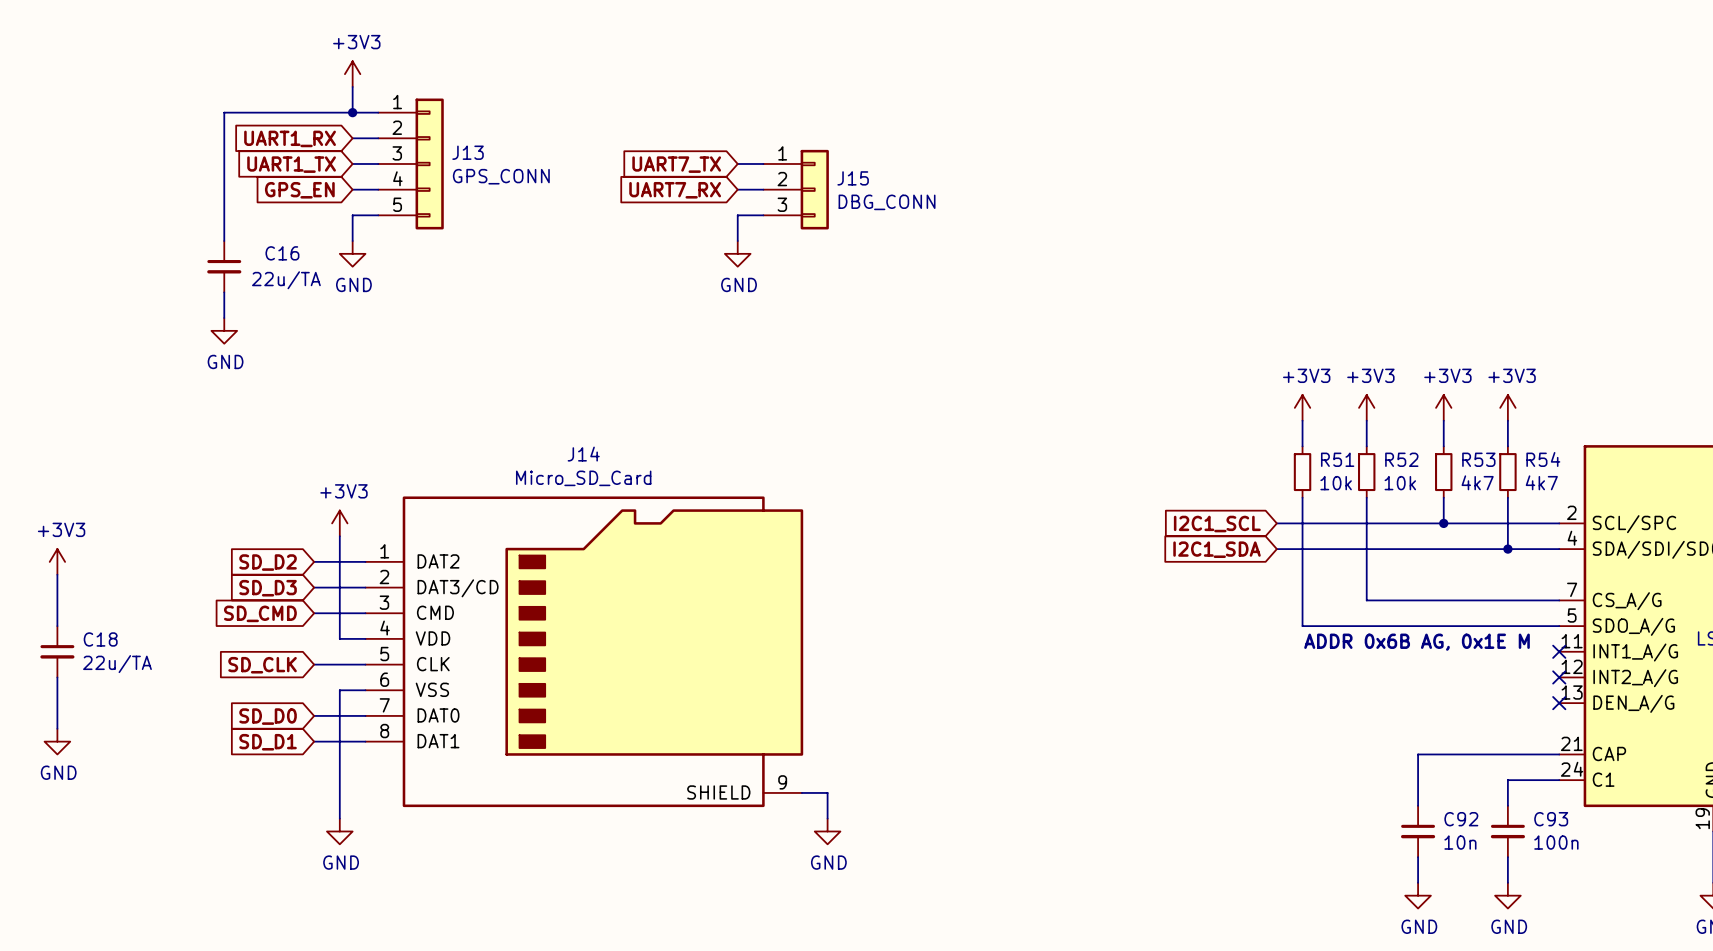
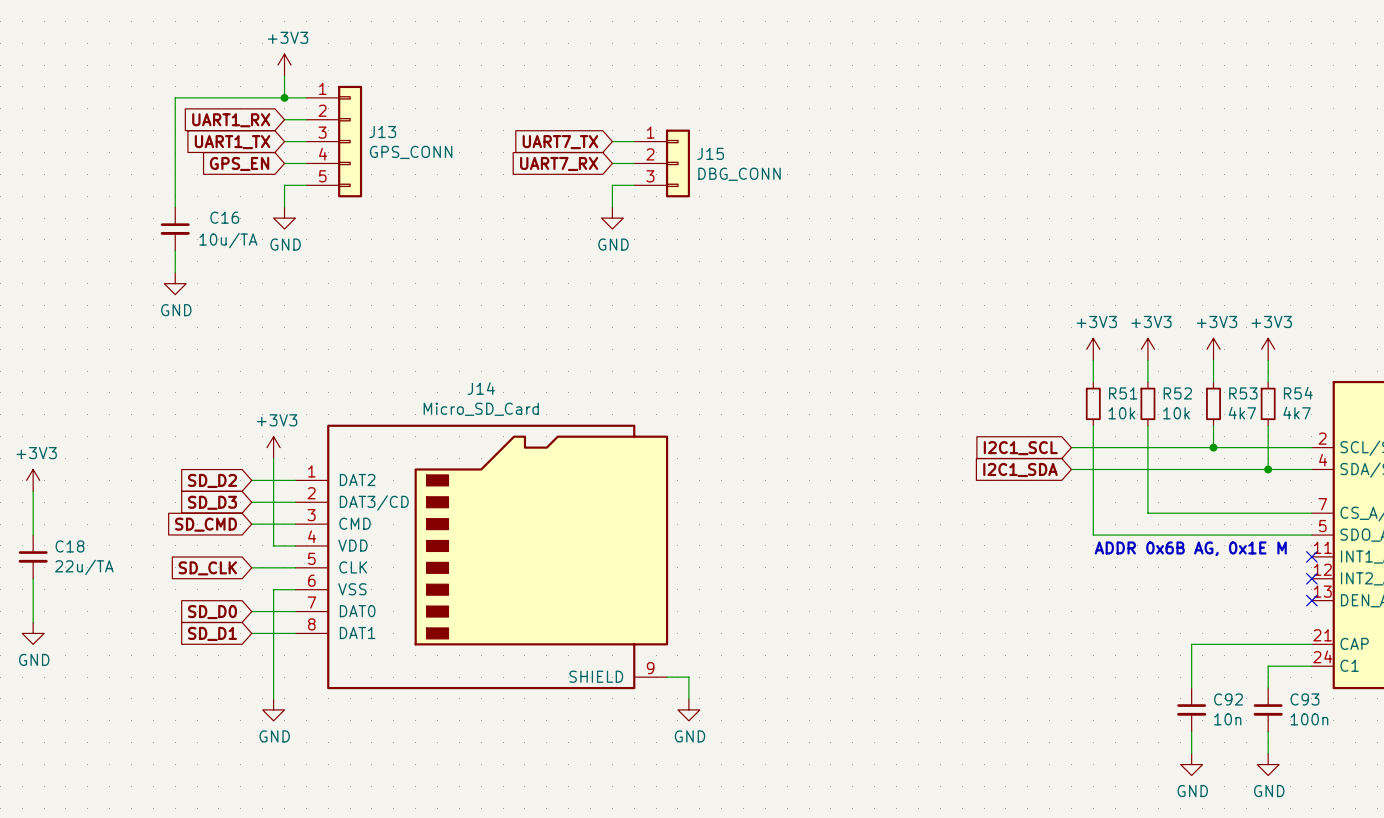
C16 value: 22u/TA (286, 280) -> 10u/TA (228, 240)

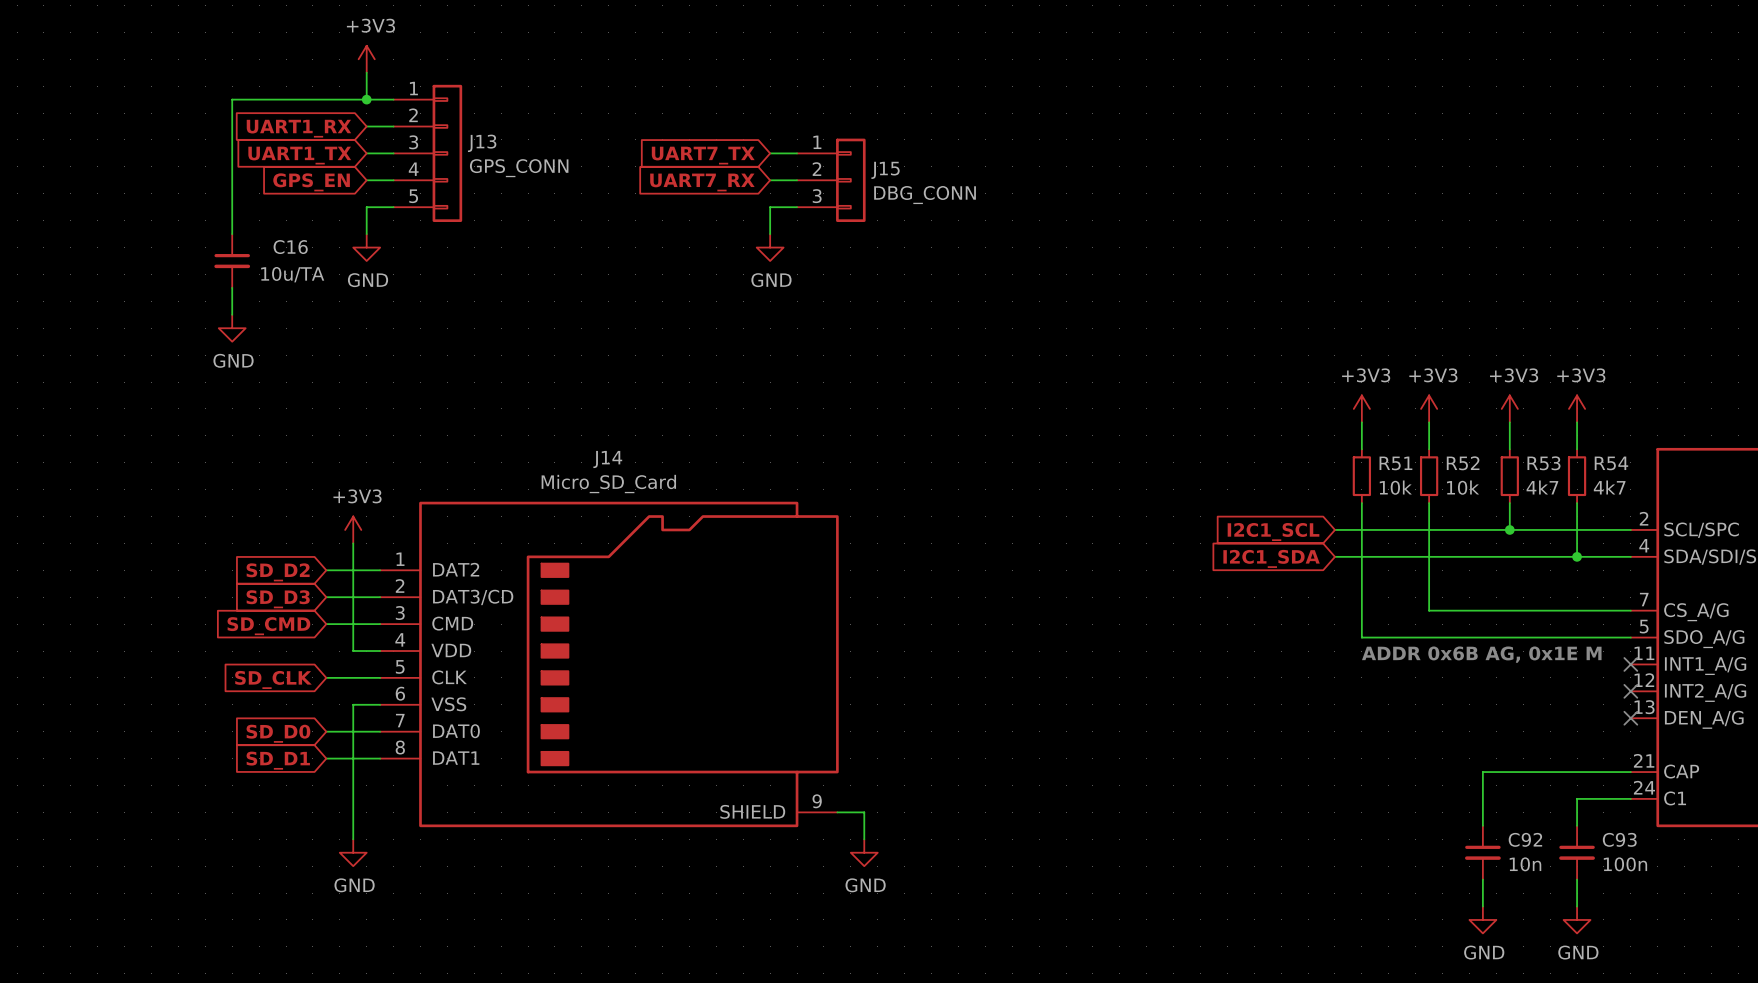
power symbol: +3V3 (33, 480) -> none
wire: (33, 491) (33, 535) -> none
C18: 22u/TA (33, 556) -> none
wire: (33, 578) (33, 622) -> none
power symbol: GND (33, 633) -> none

